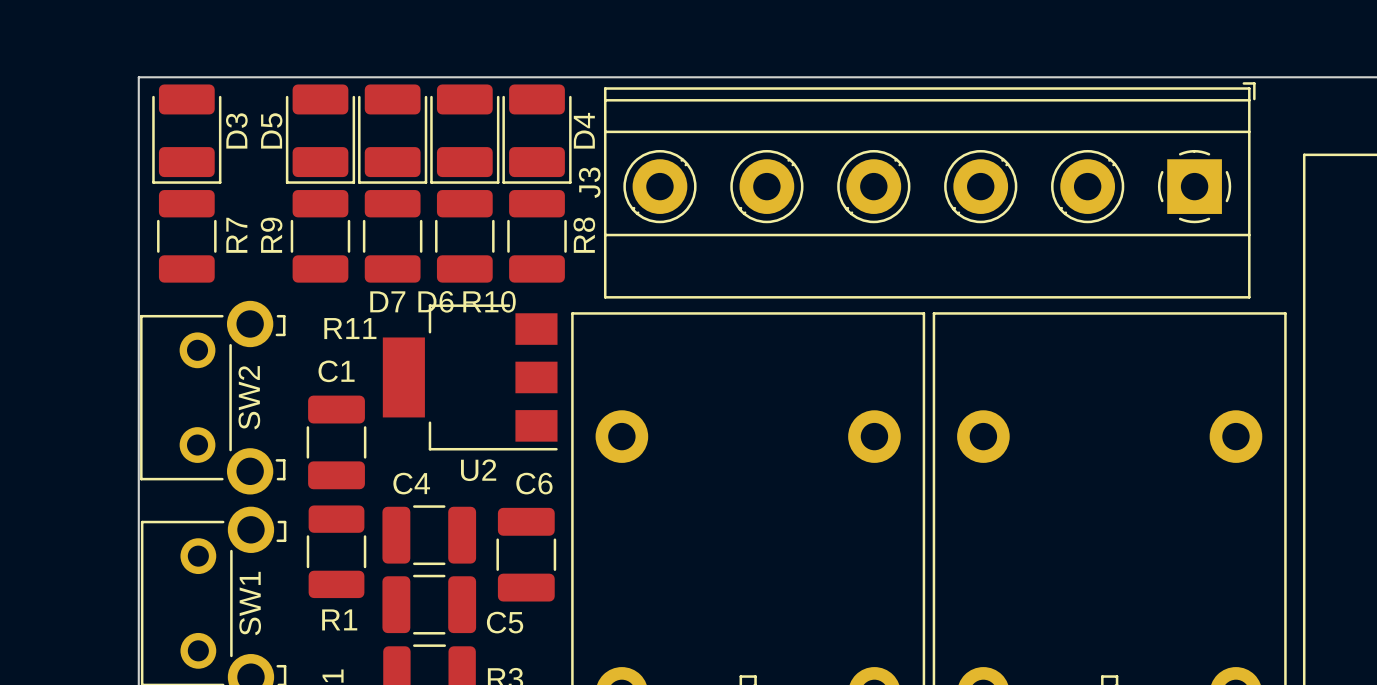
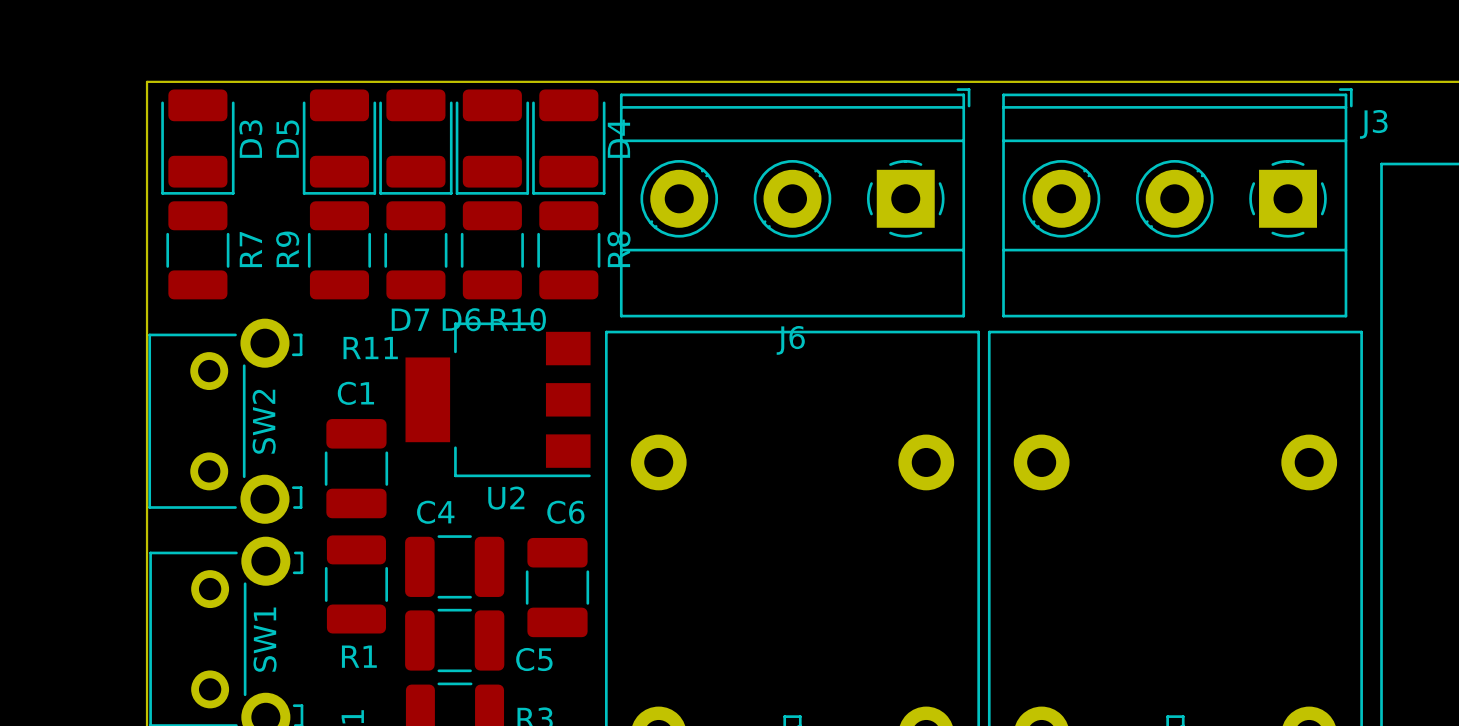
J3 footprint: [603, 82, 1256, 299] -> [1002, 88, 1353, 318]
J3 name position: J3 (589, 182) -> J3 (1373, 124)
J6: none -> (795, 202)

